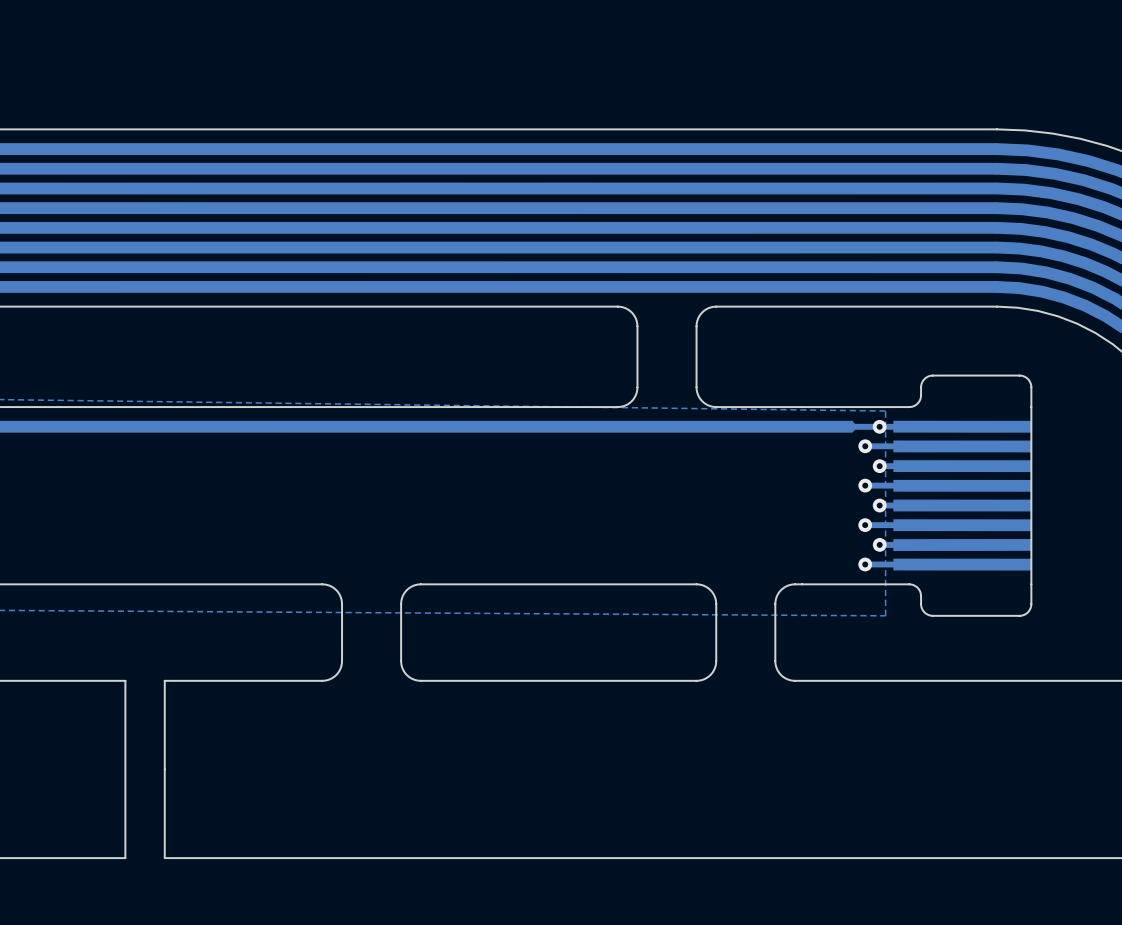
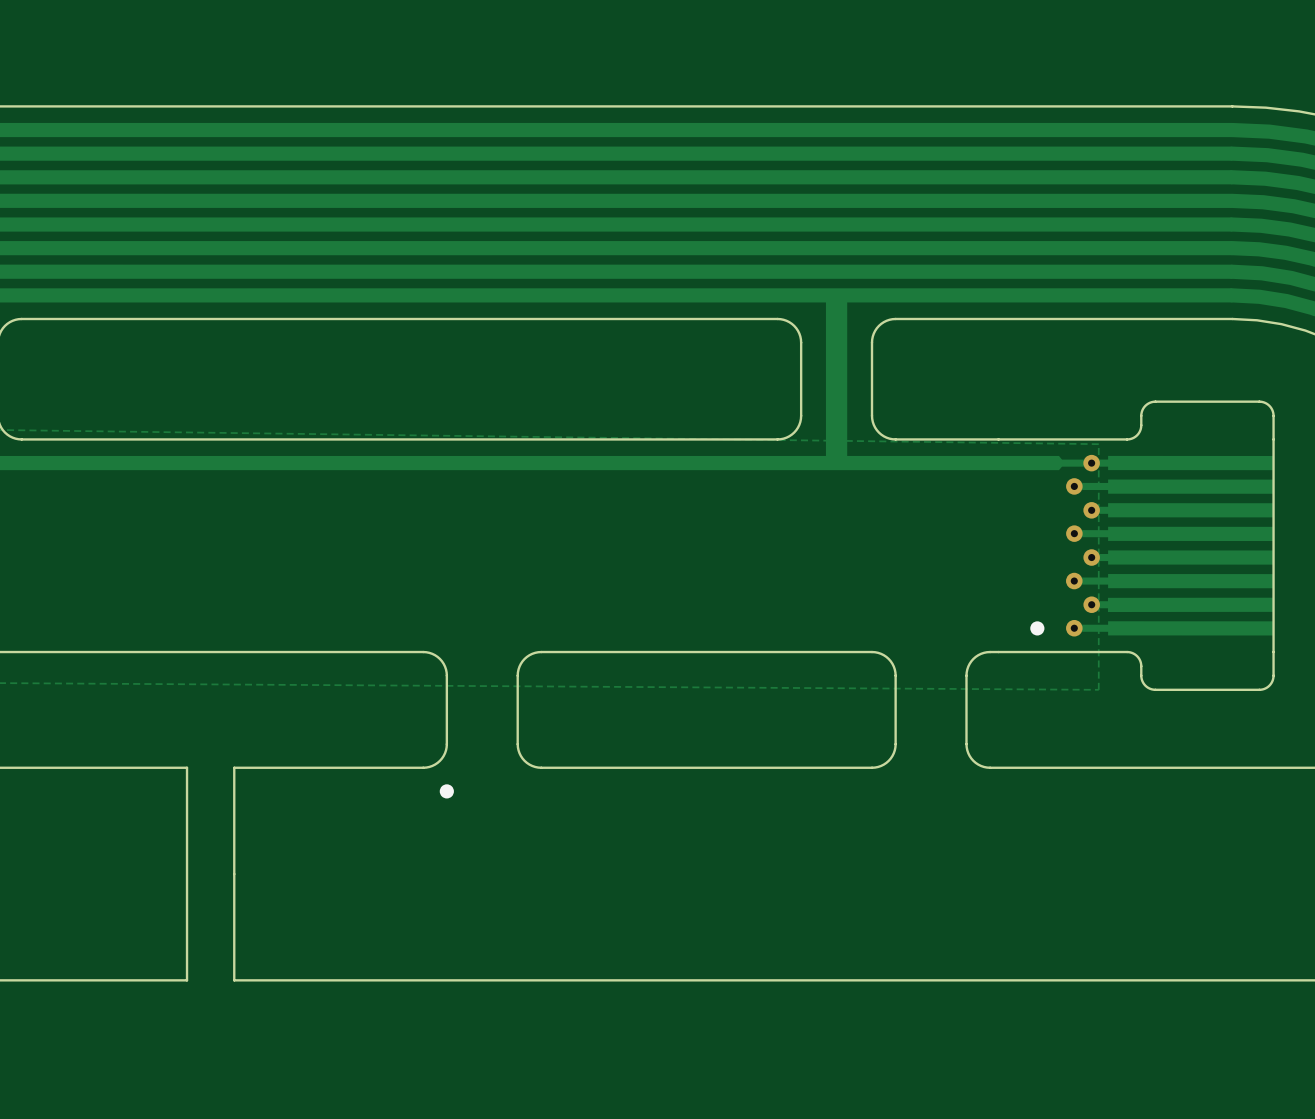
drawing: none -> [825, 295, 848, 461]
drawing: none -> [1030, 621, 1045, 636]
drawing: none -> [439, 784, 454, 799]

